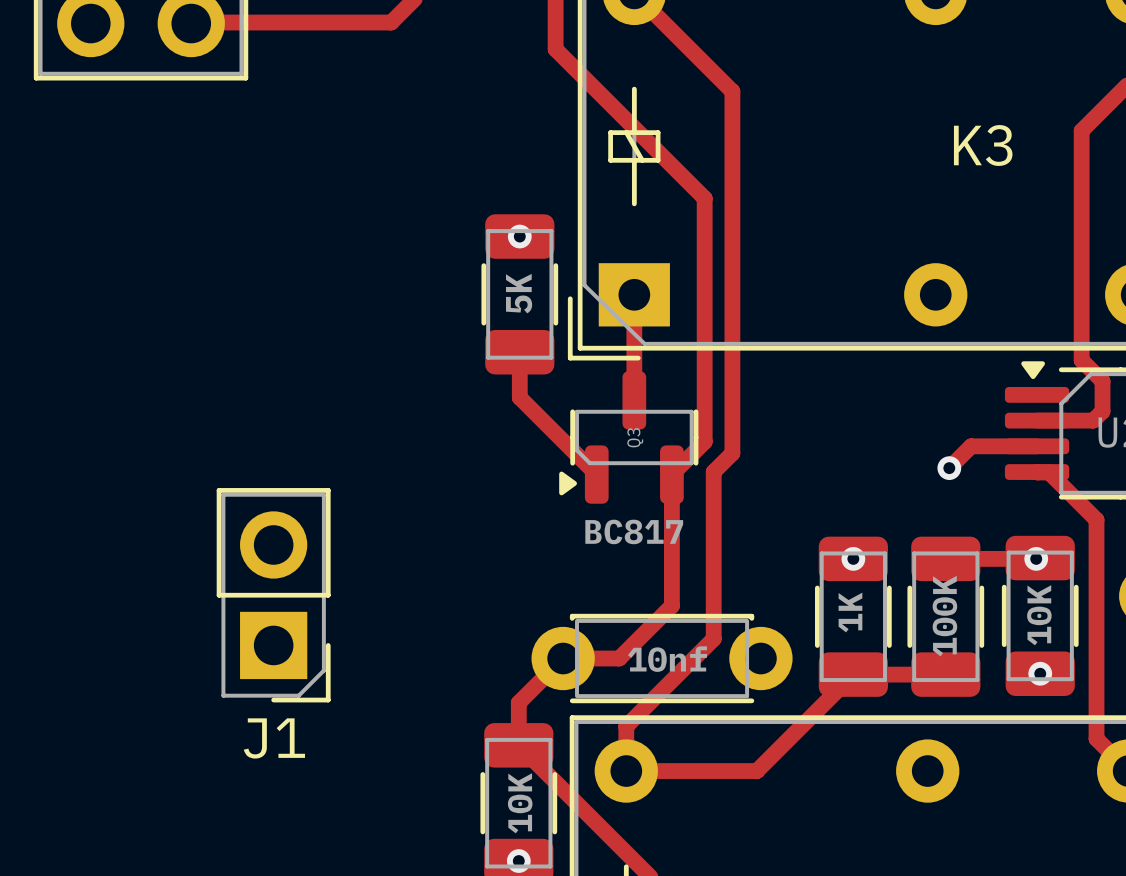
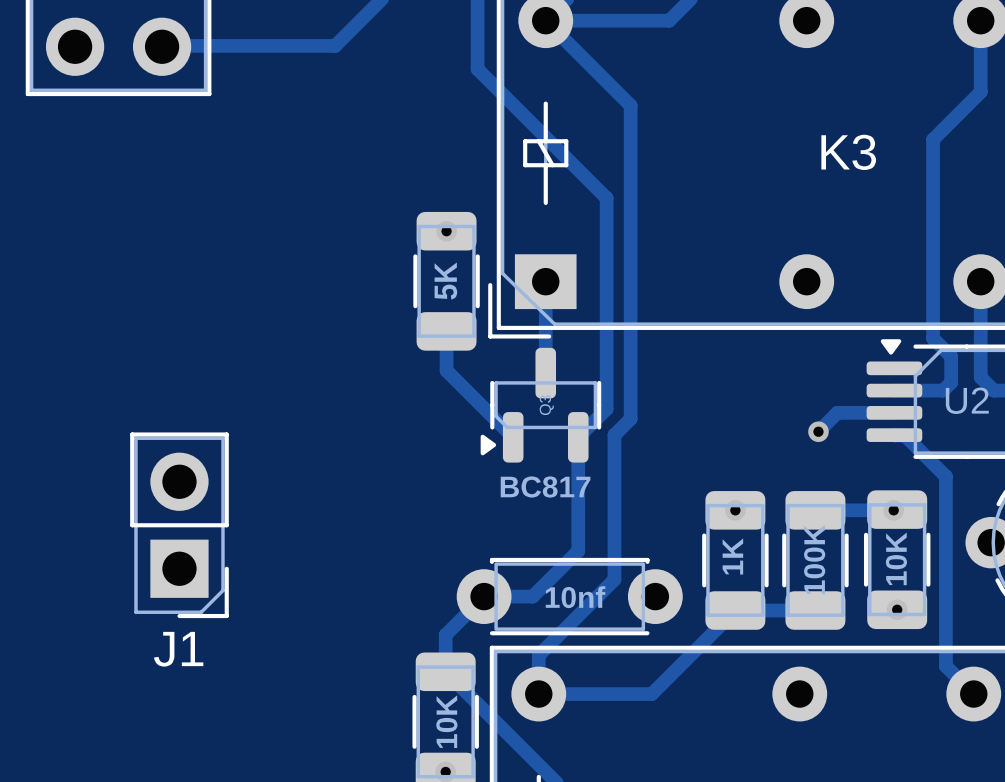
J1 position: (273, 595) -> (179, 525)

